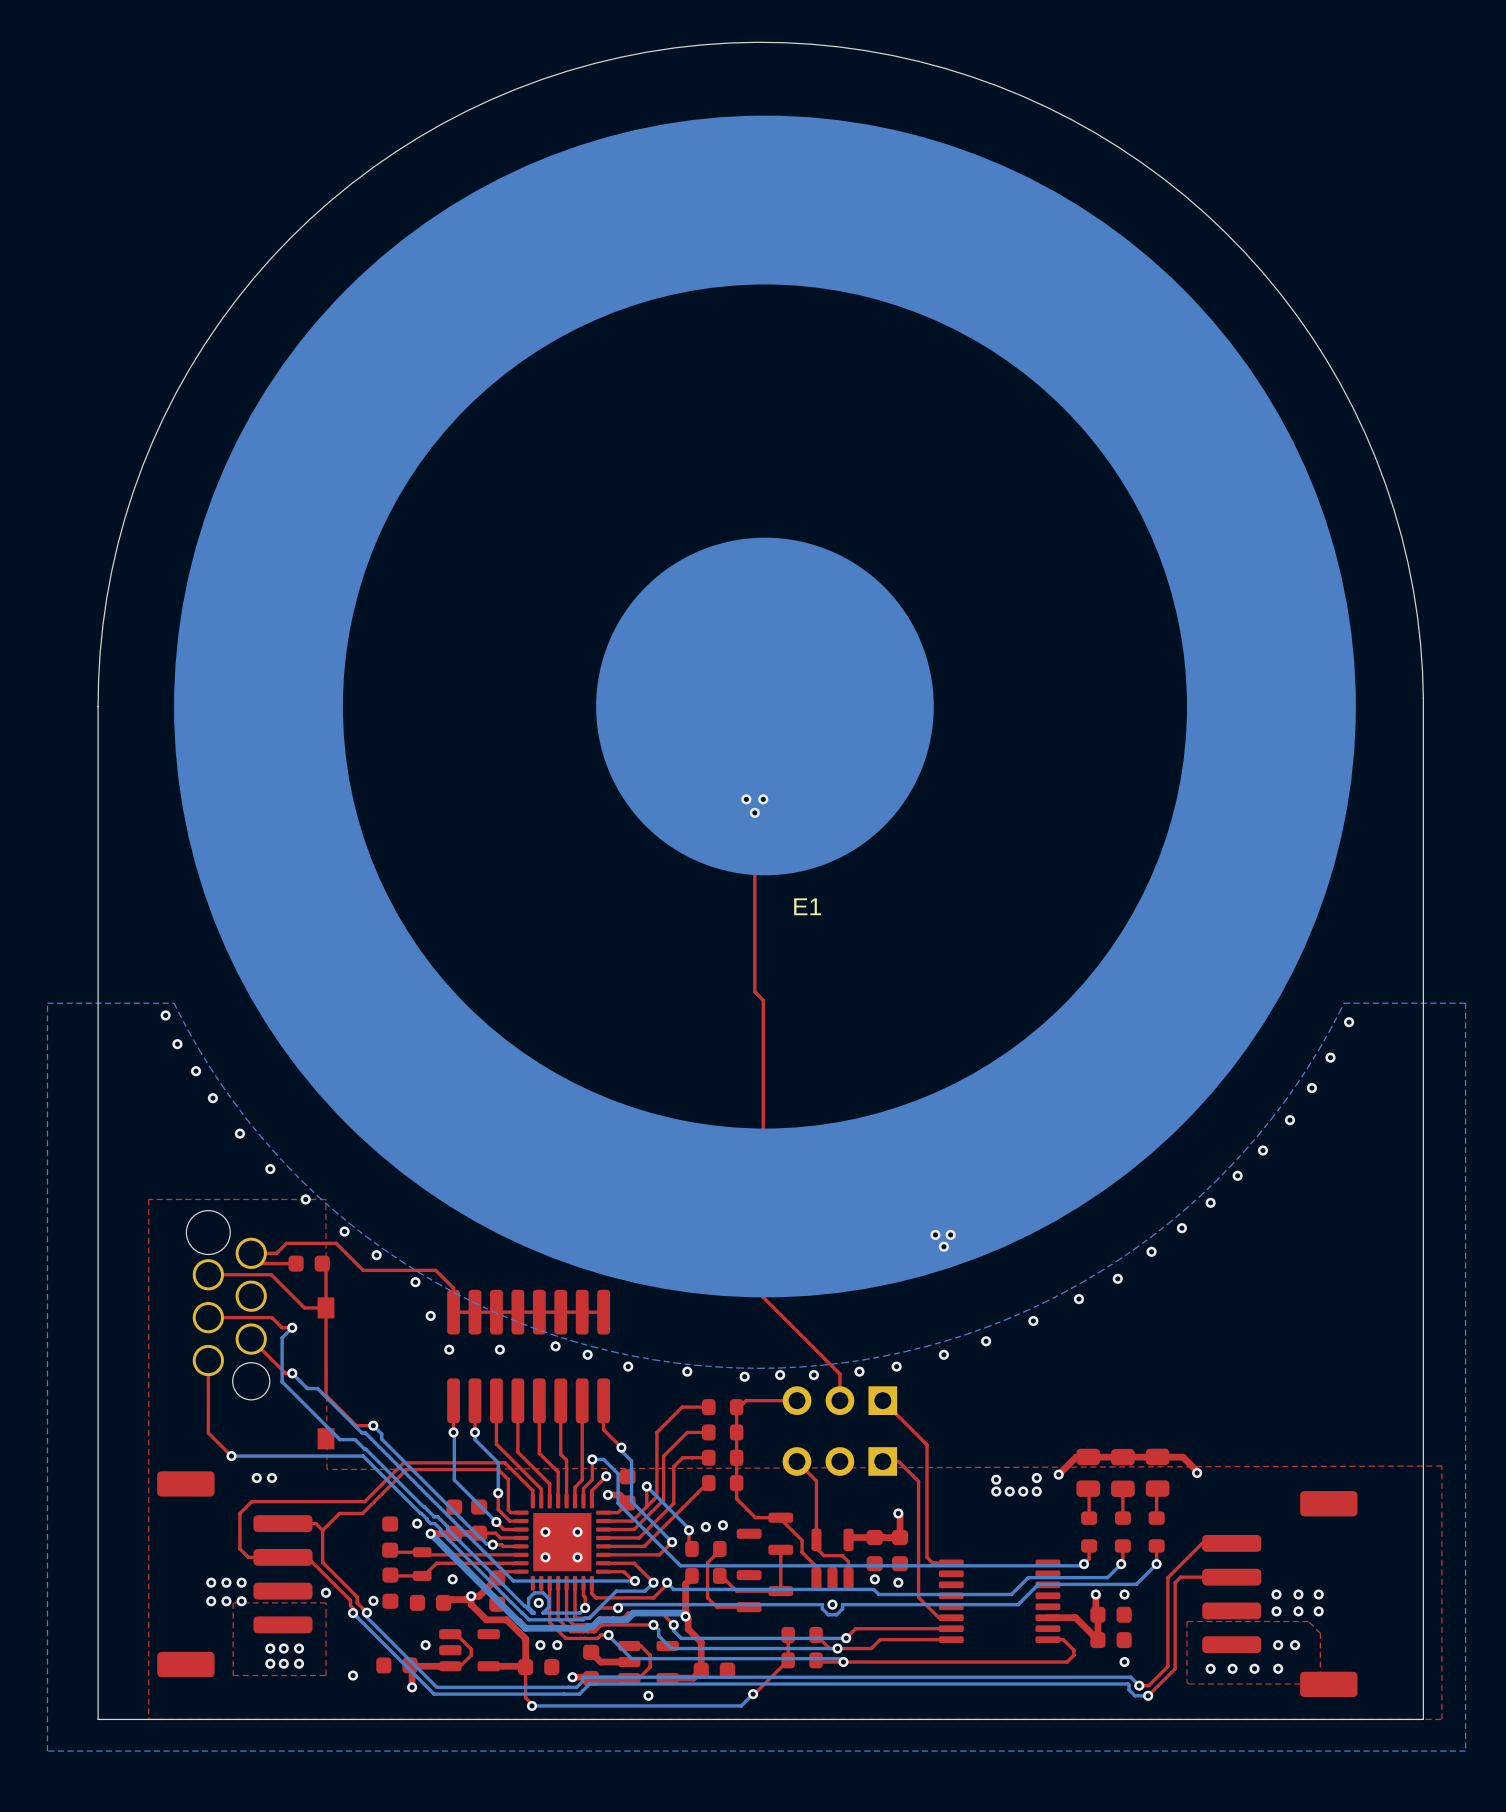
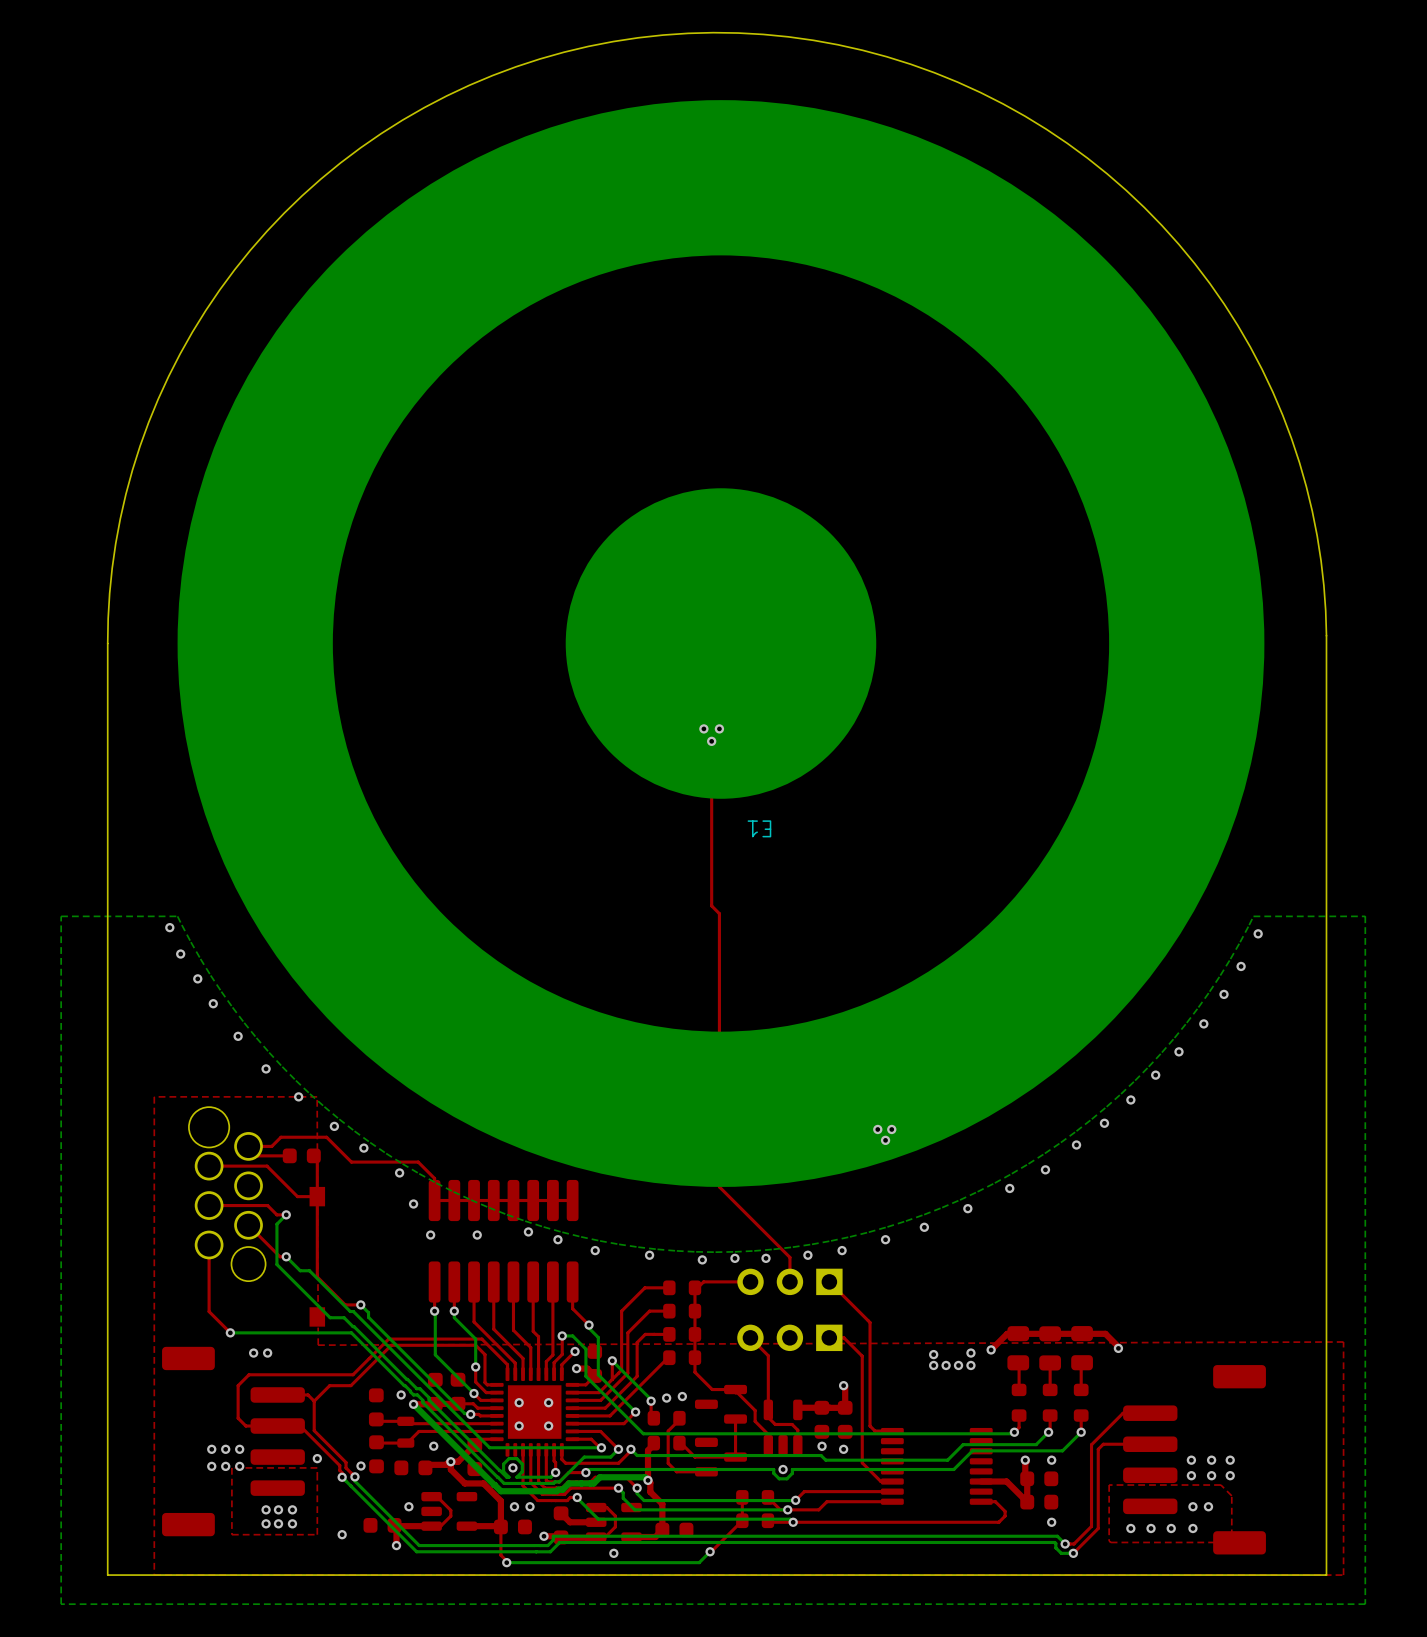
E1 name rotation: 0° (807, 906) -> 180° (759, 828)

